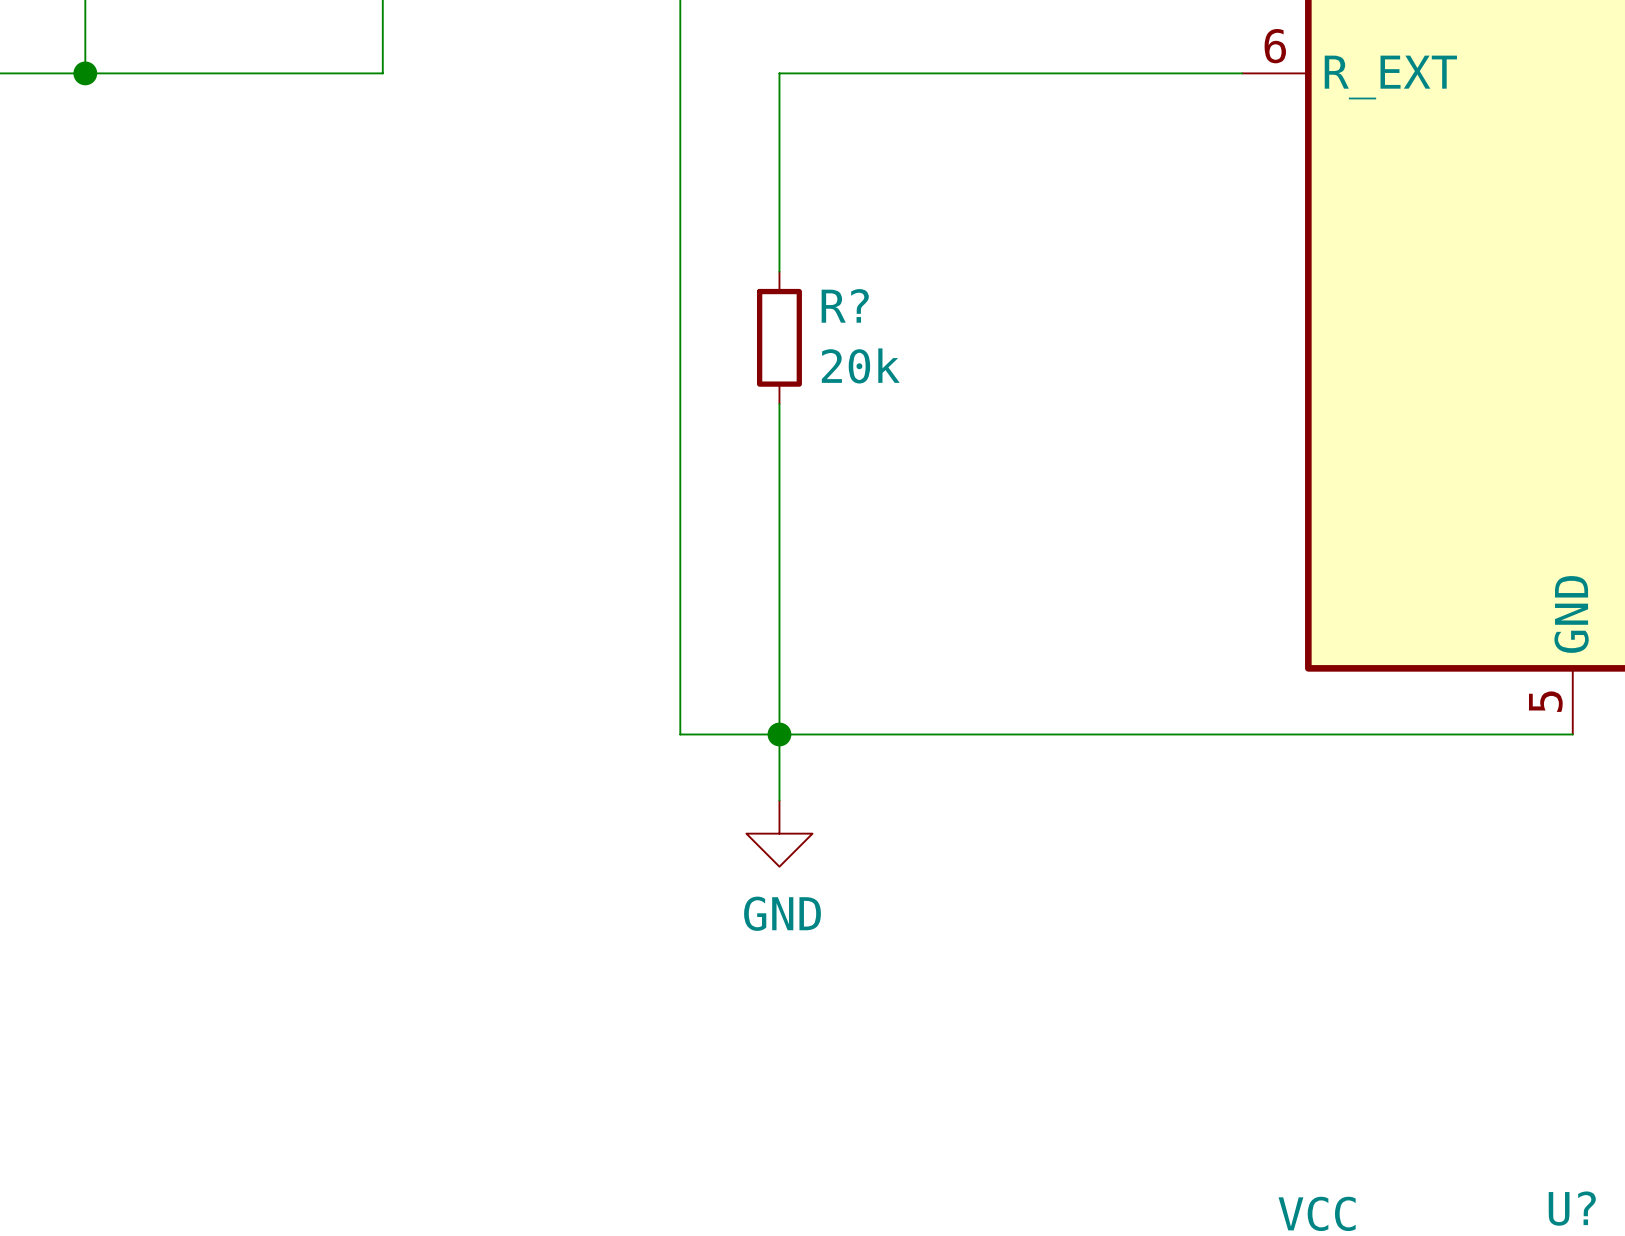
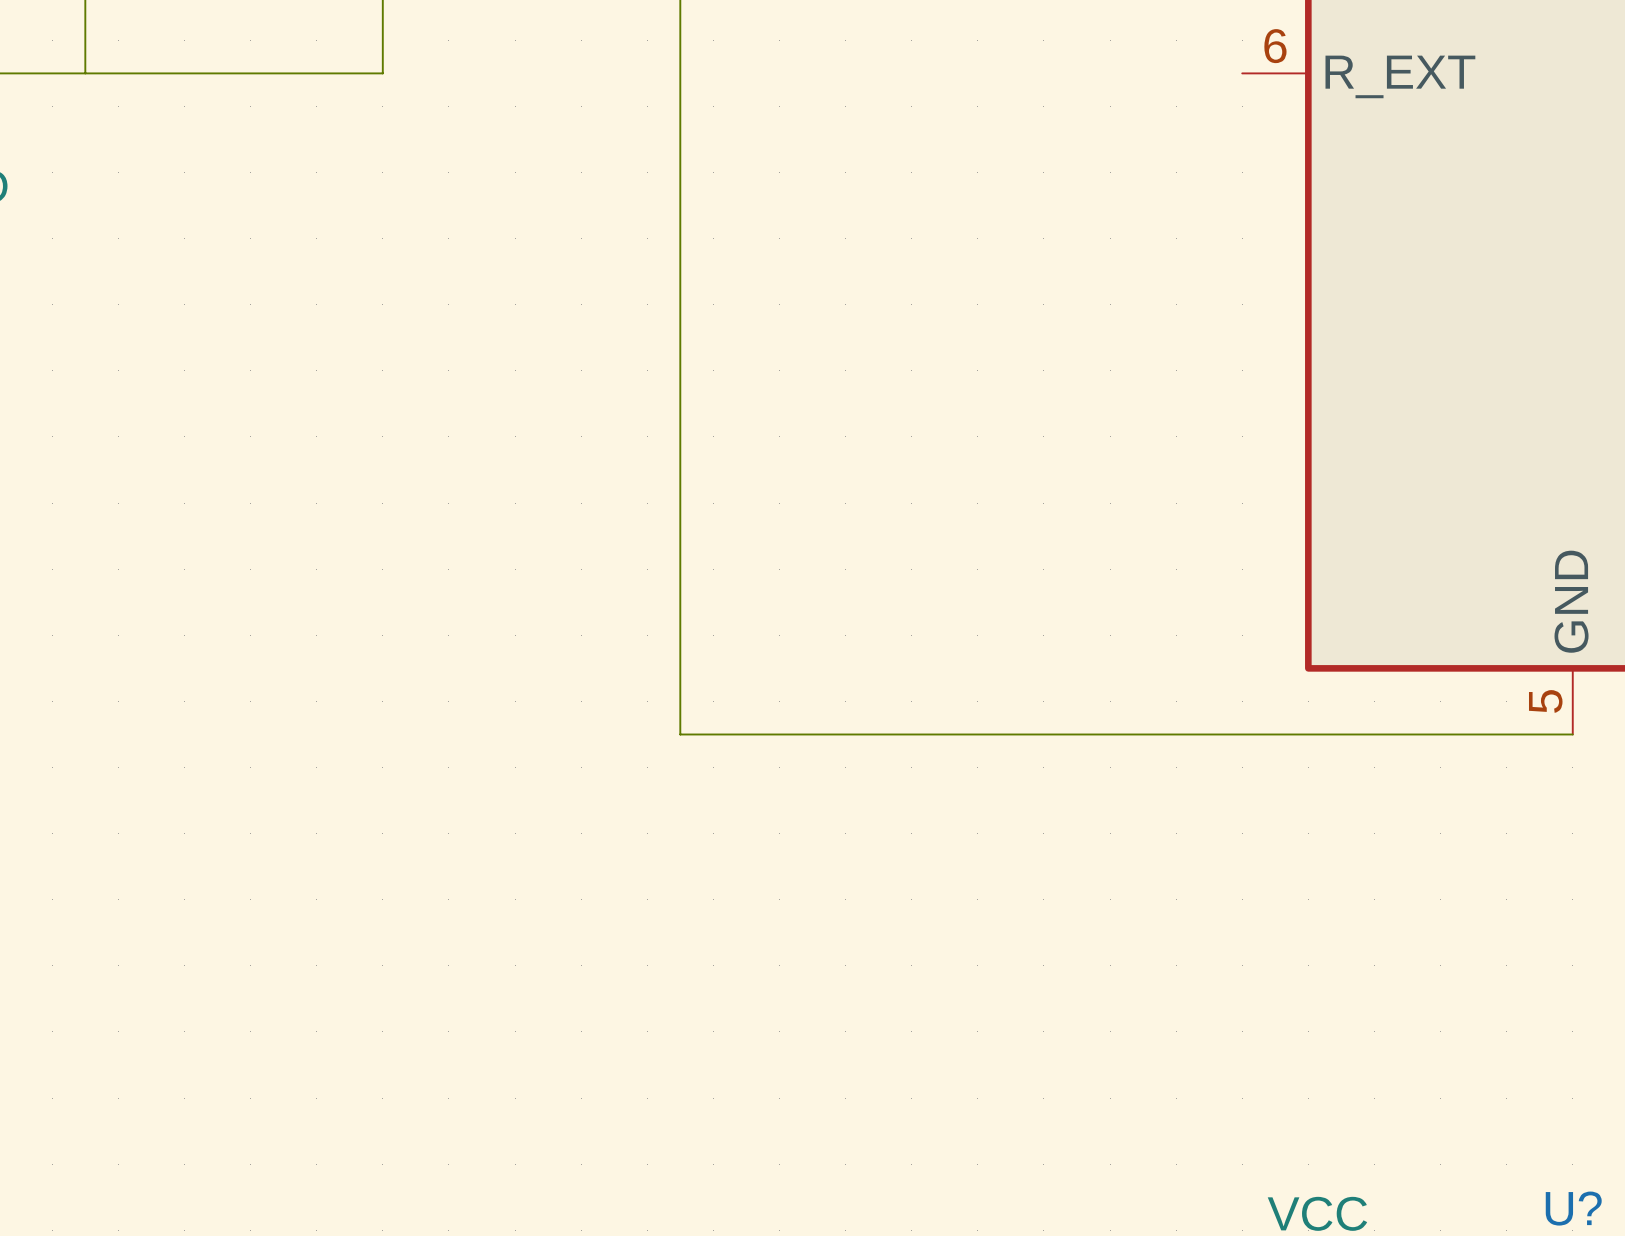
junction: (85, 73) -> none
wire: (1242, 73) (779, 73) (779, 271) -> none
R?: 20k (779, 337) -> none
wire: (779, 403) (779, 800) -> none
junction: (779, 734) -> none
power symbol: GND (779, 833) -> none

